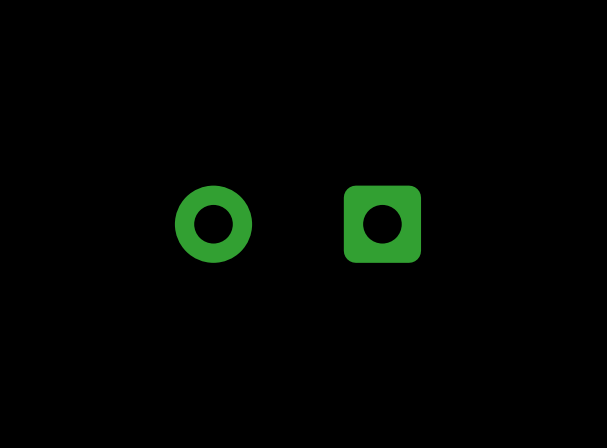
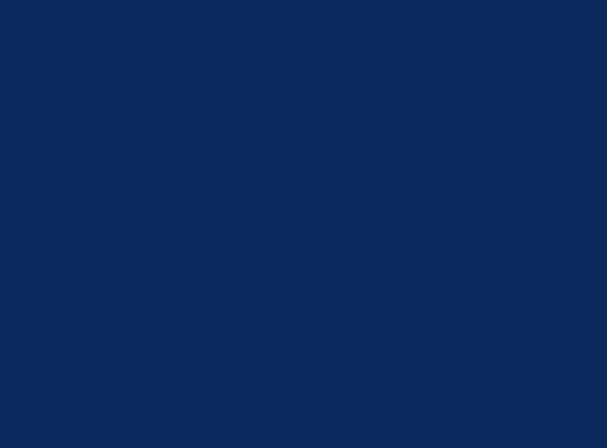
part: (297, 224) -> none

